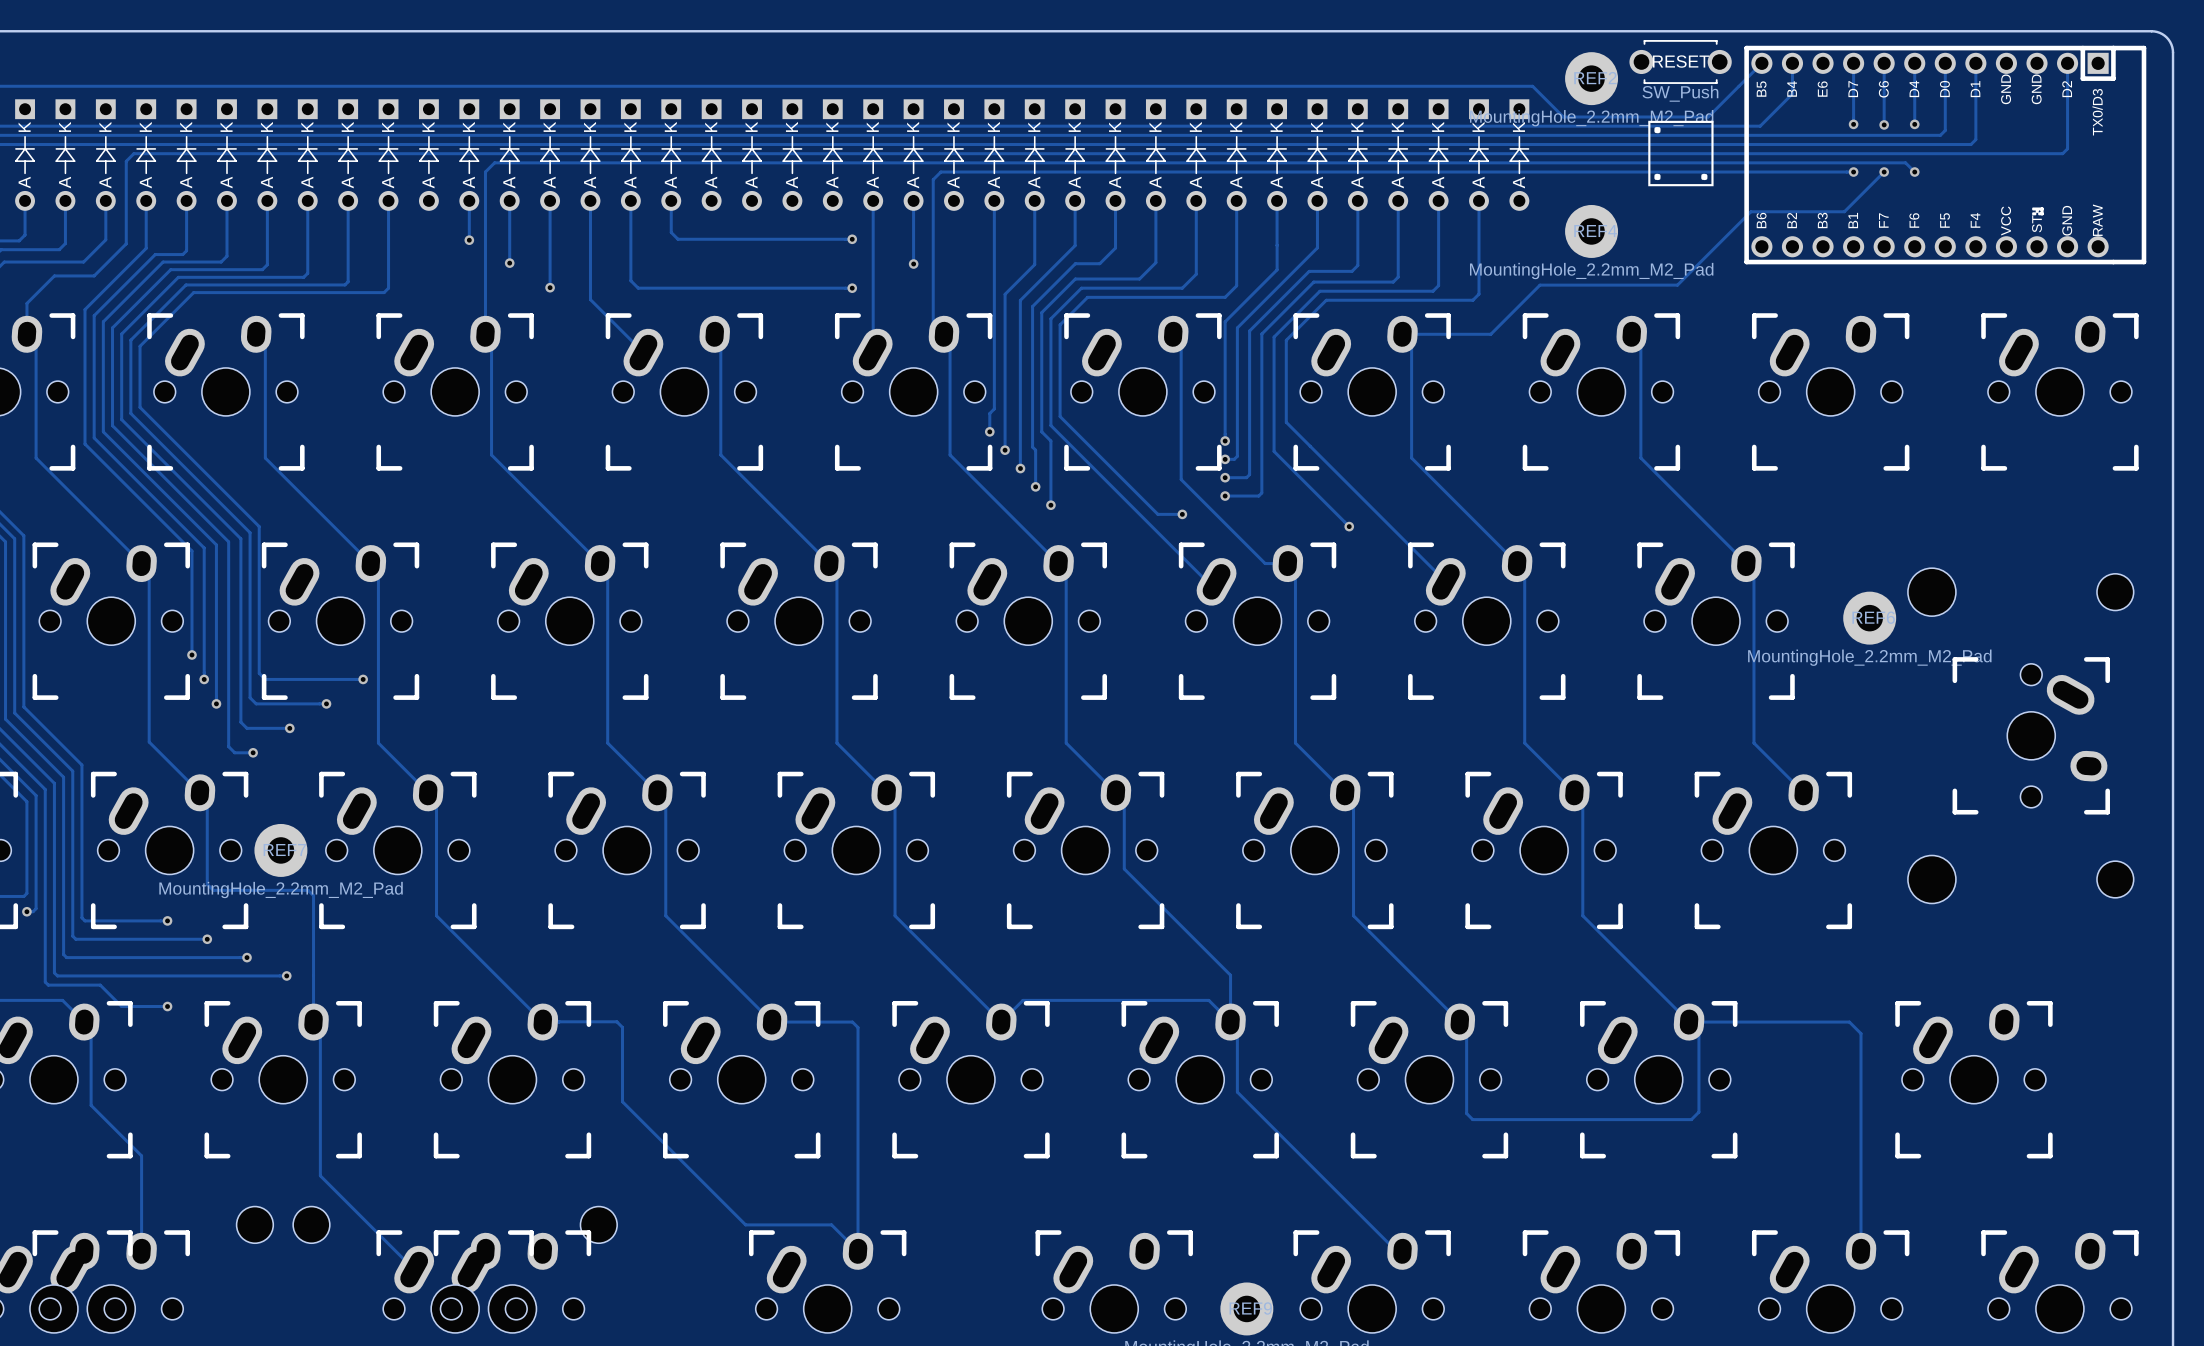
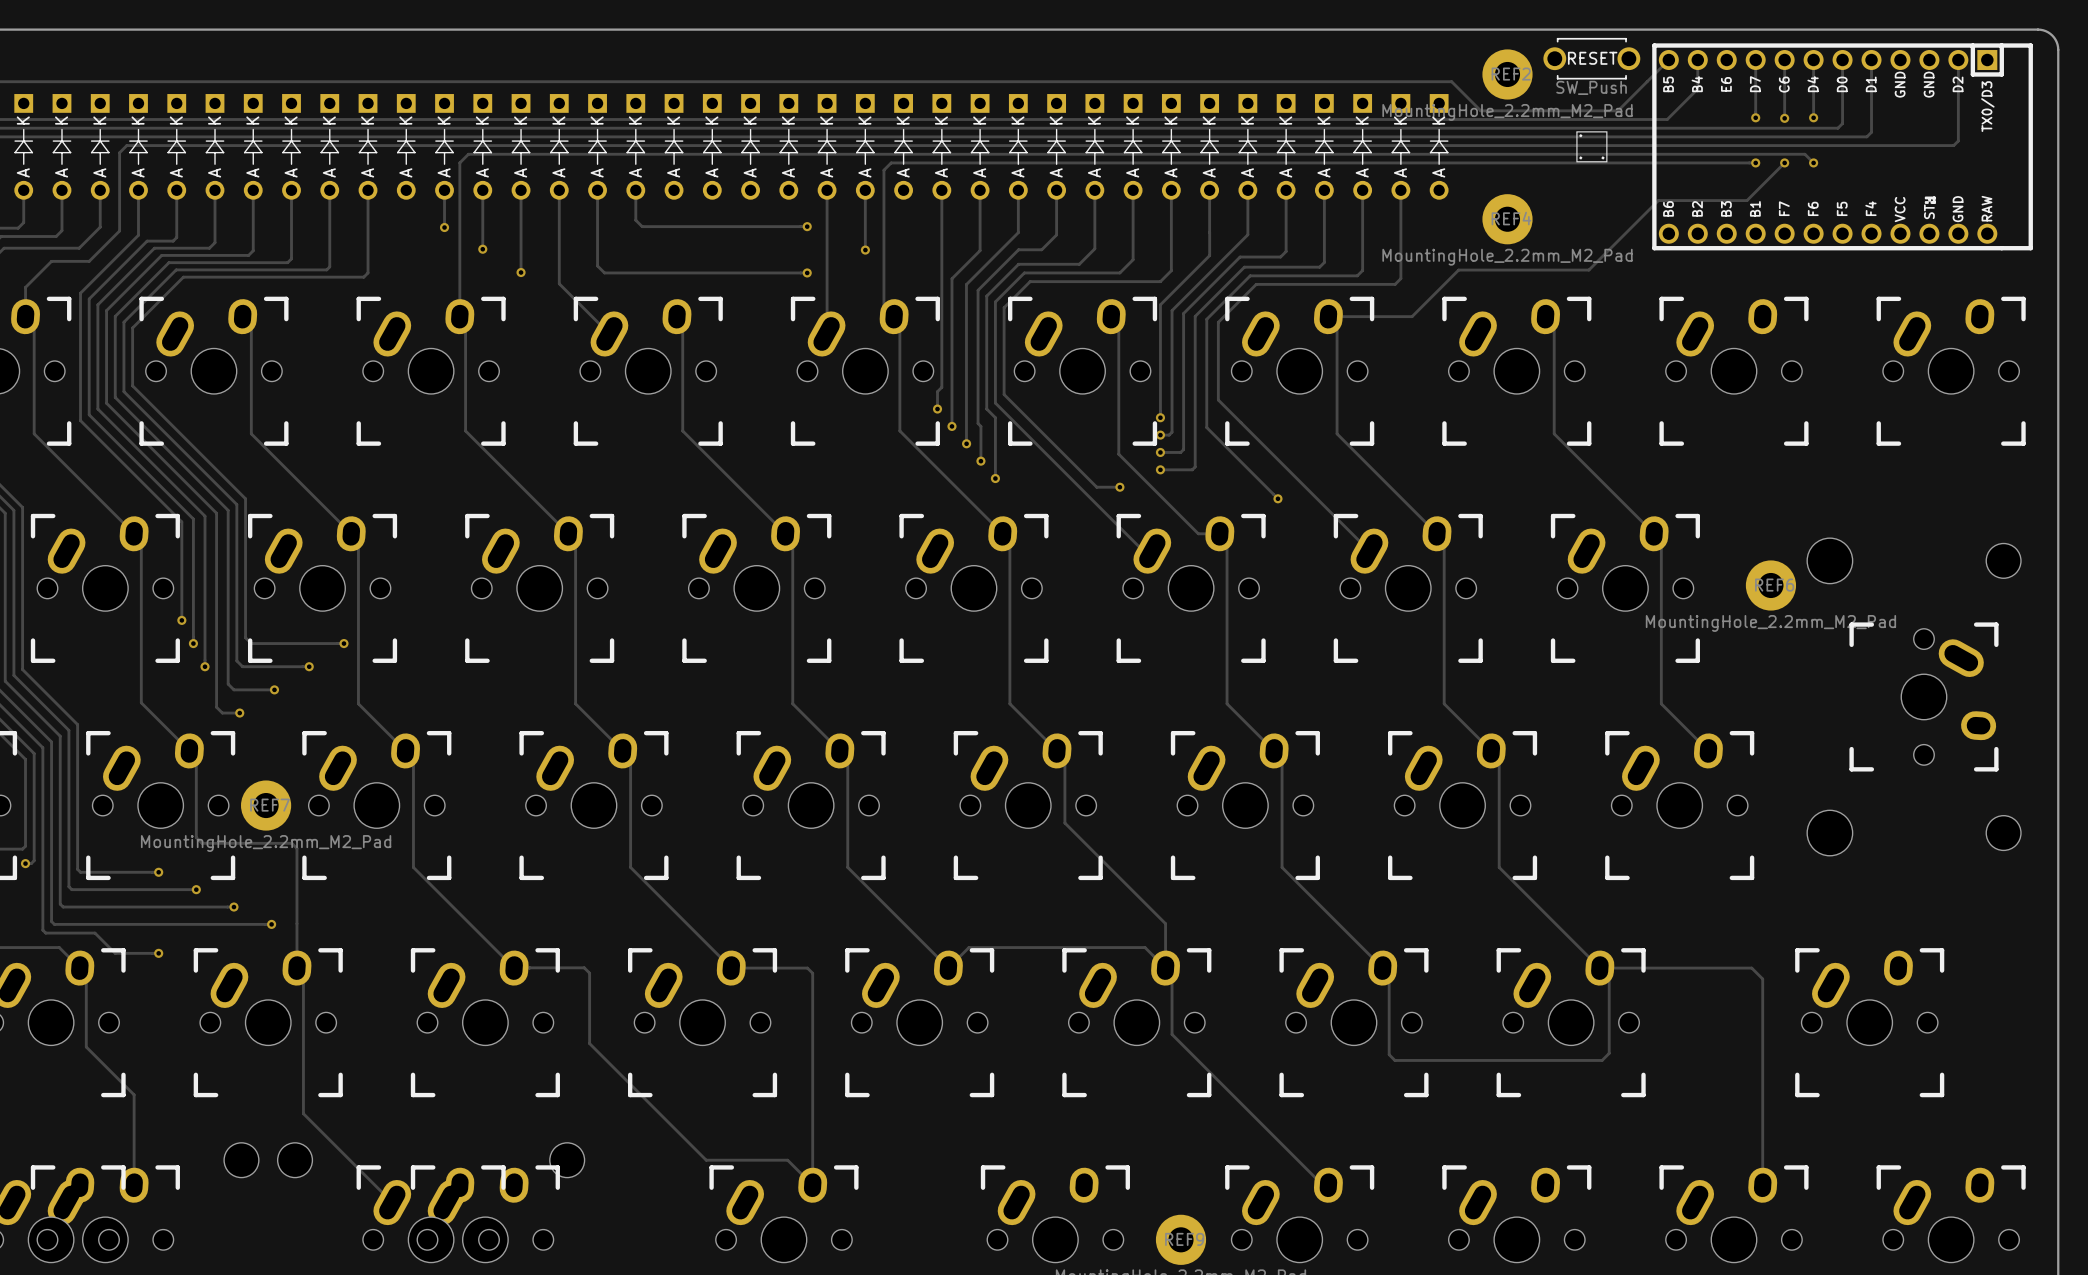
drawing shape: [1648, 120, 1714, 187] -> [1576, 131, 1608, 163]

